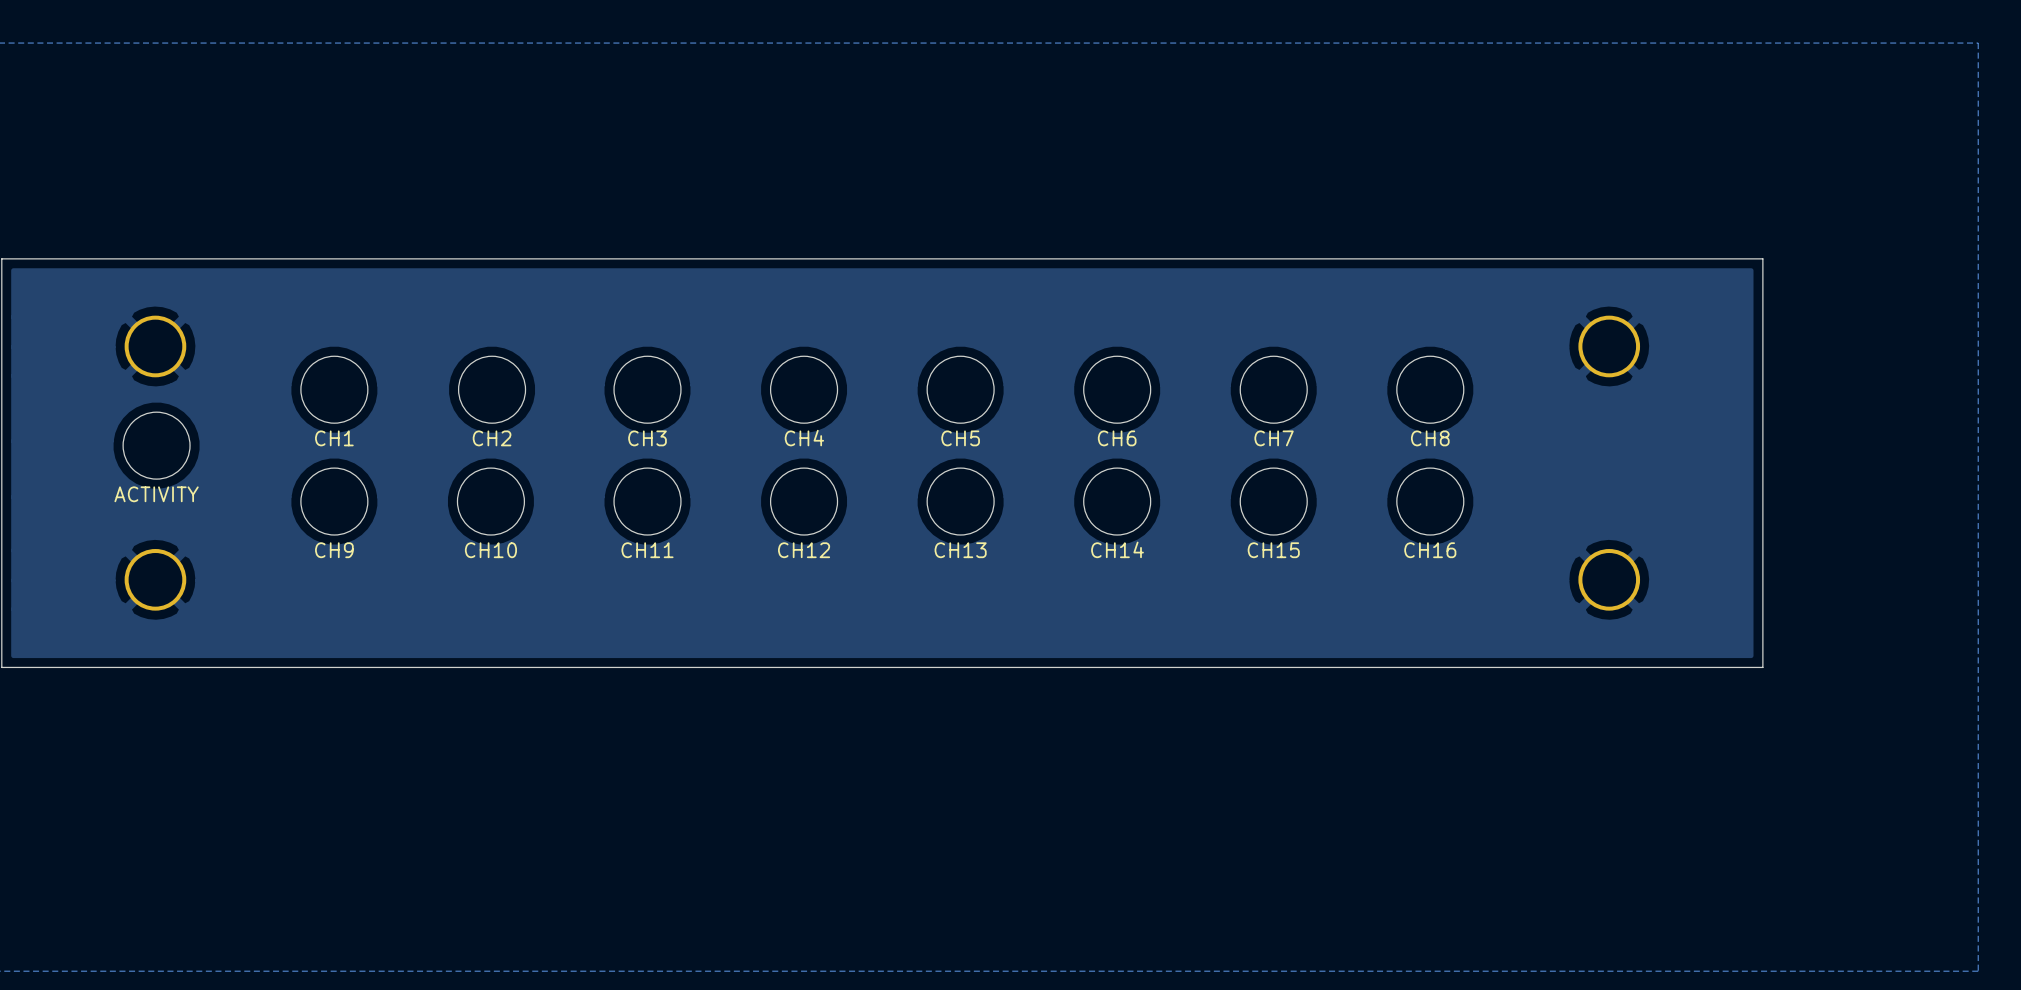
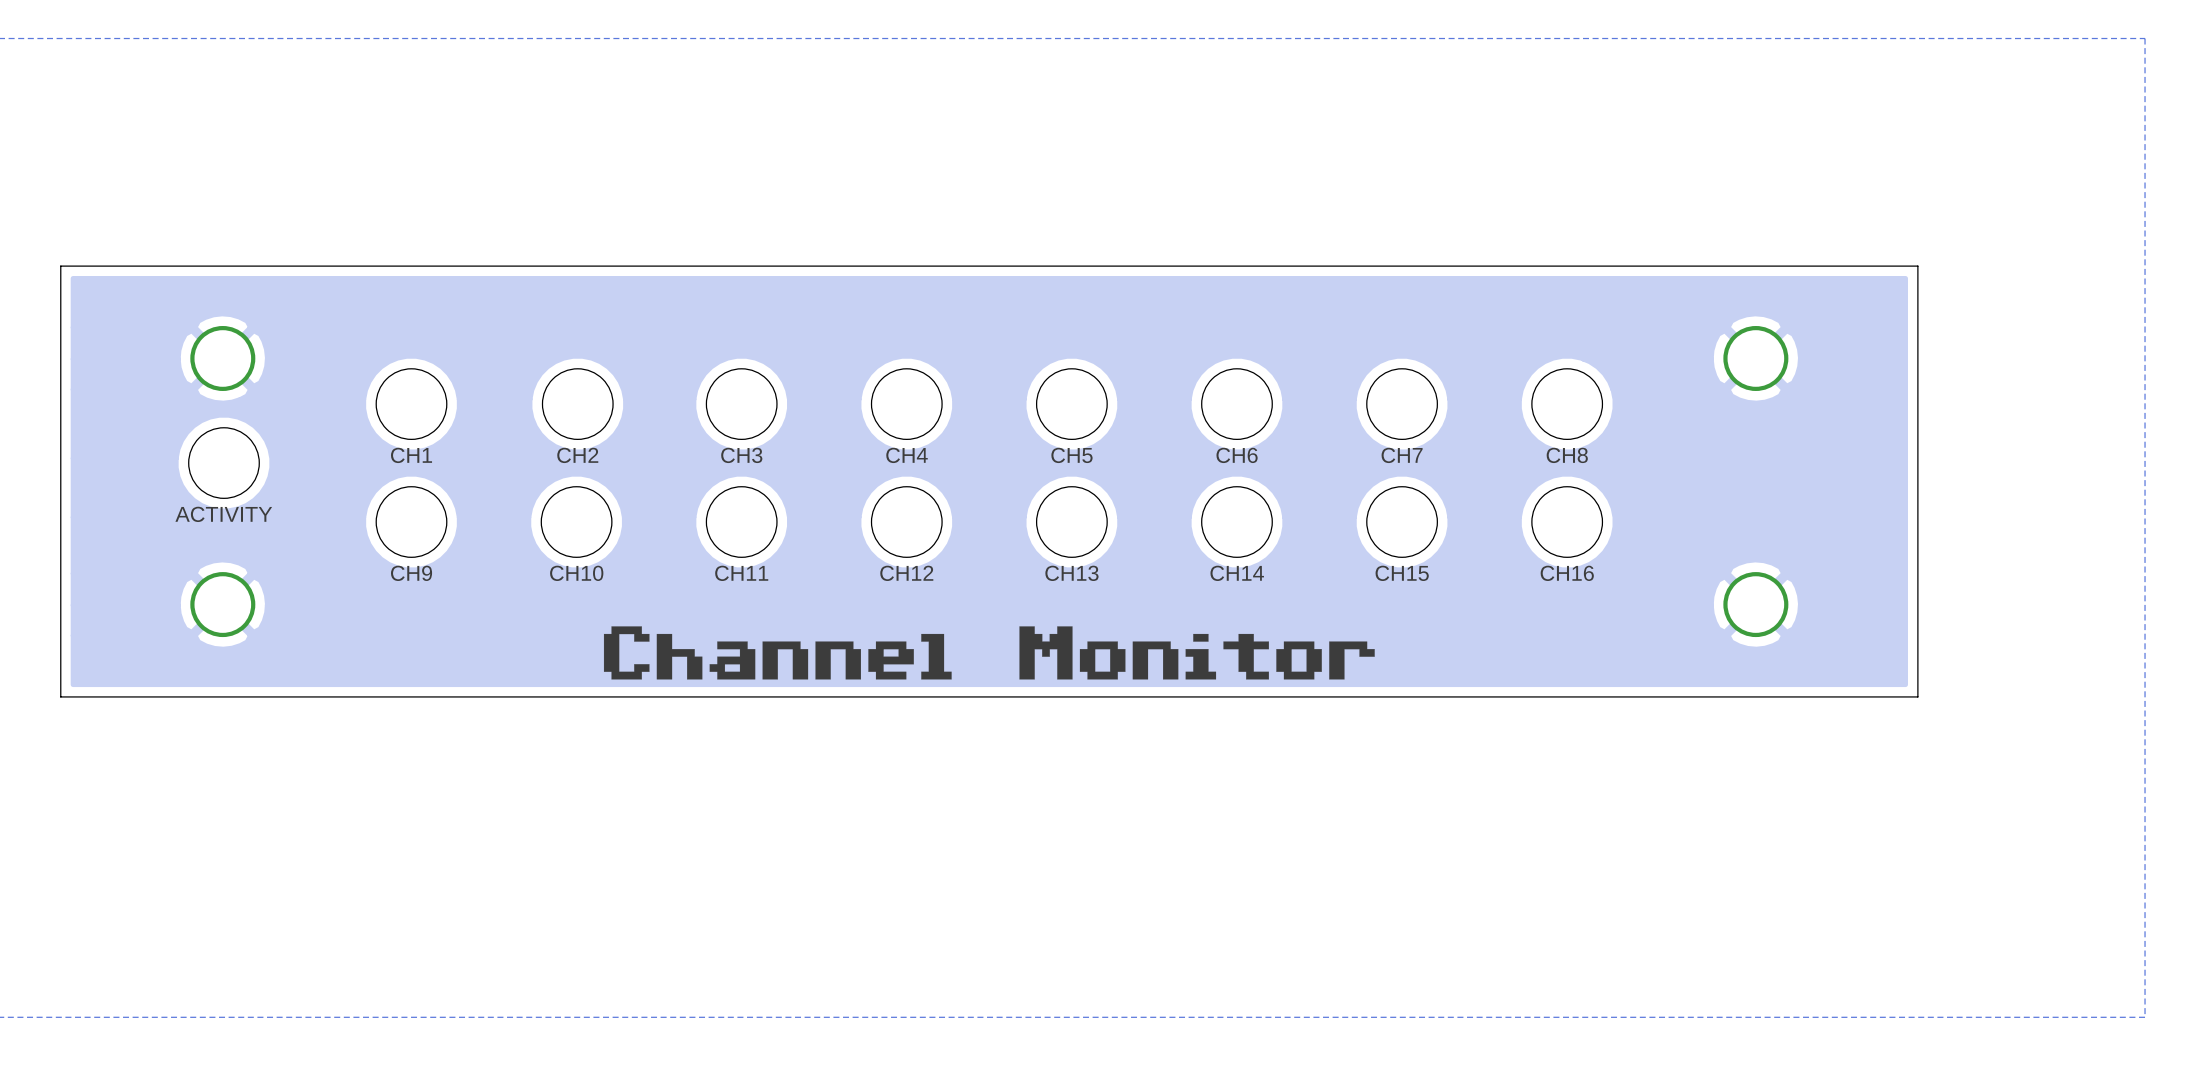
drawing: none -> [603, 626, 1375, 680]

